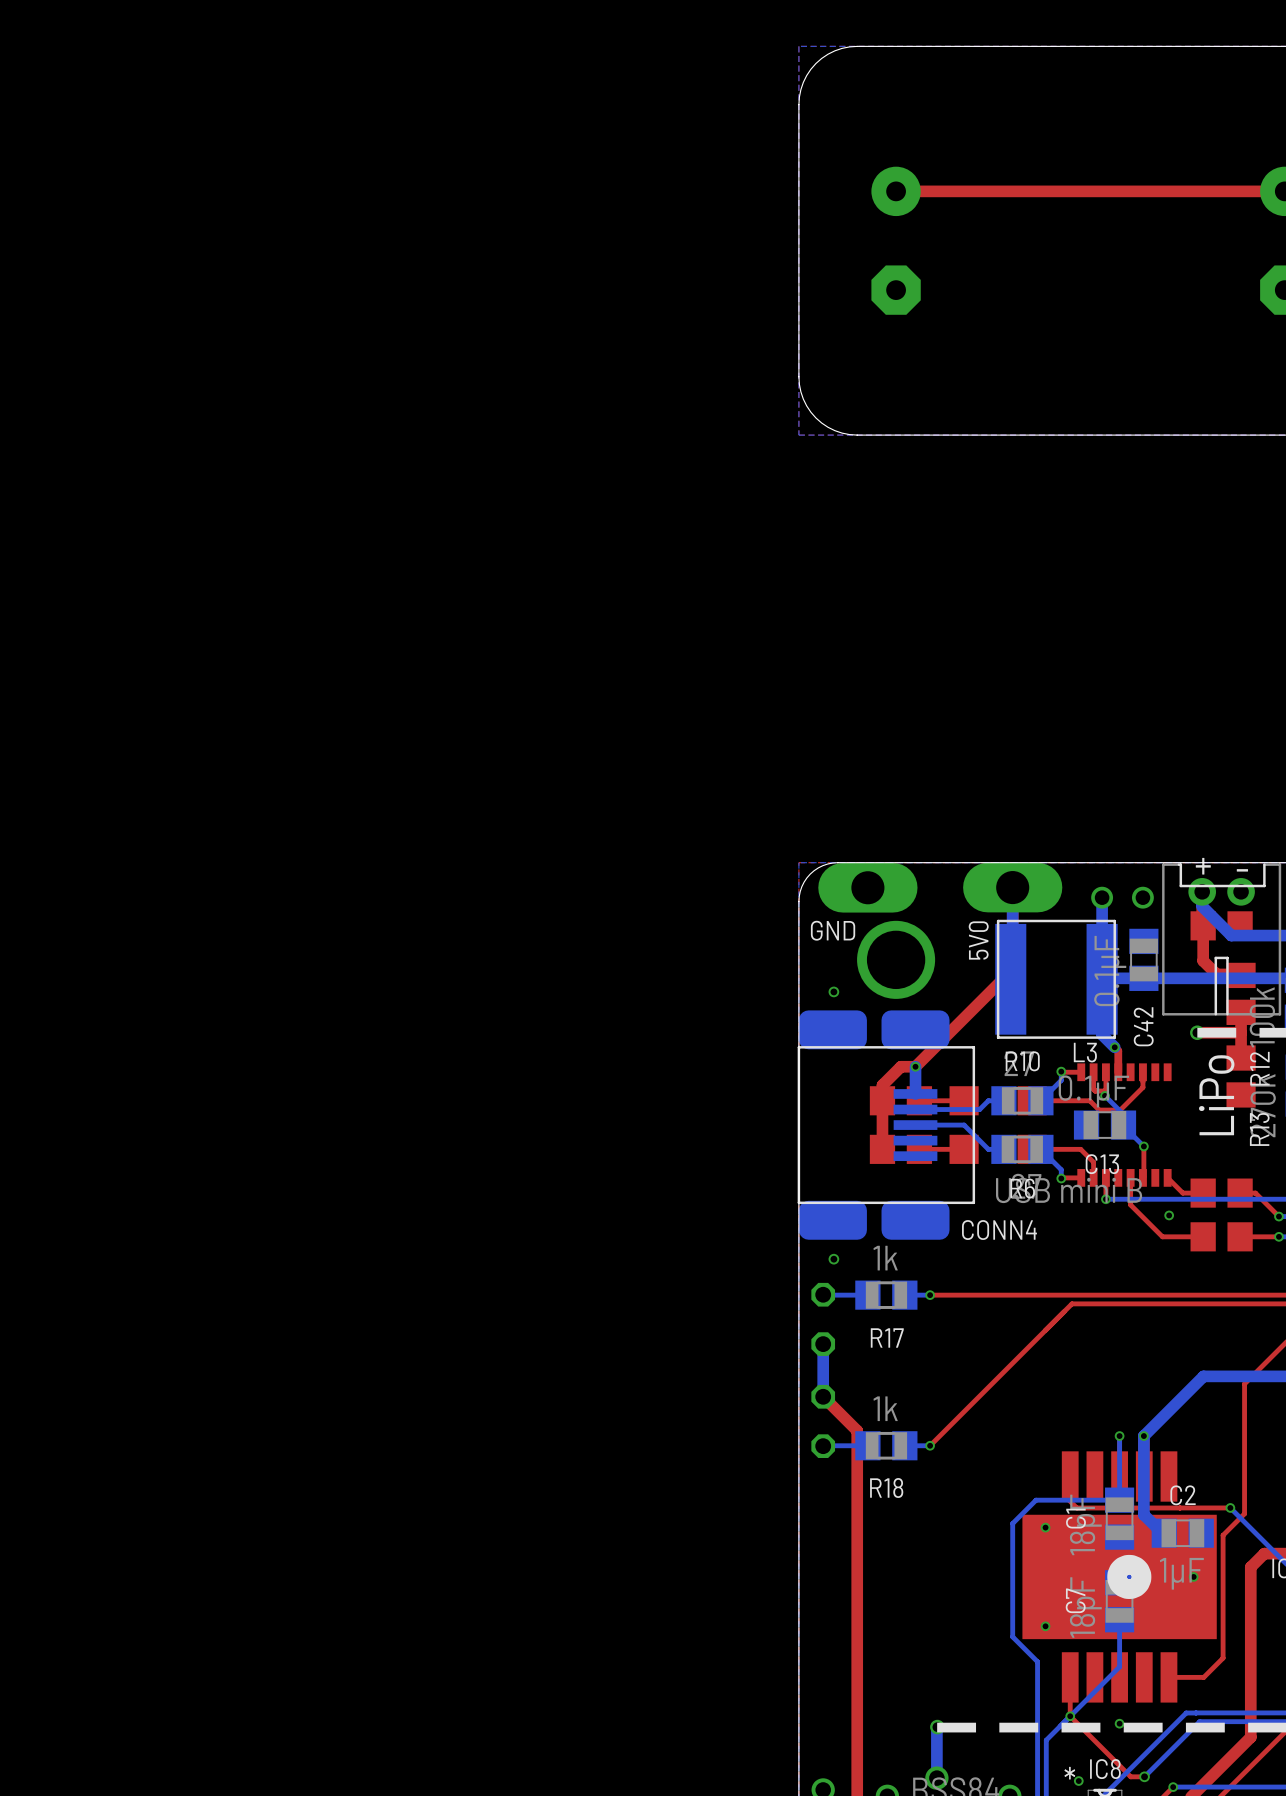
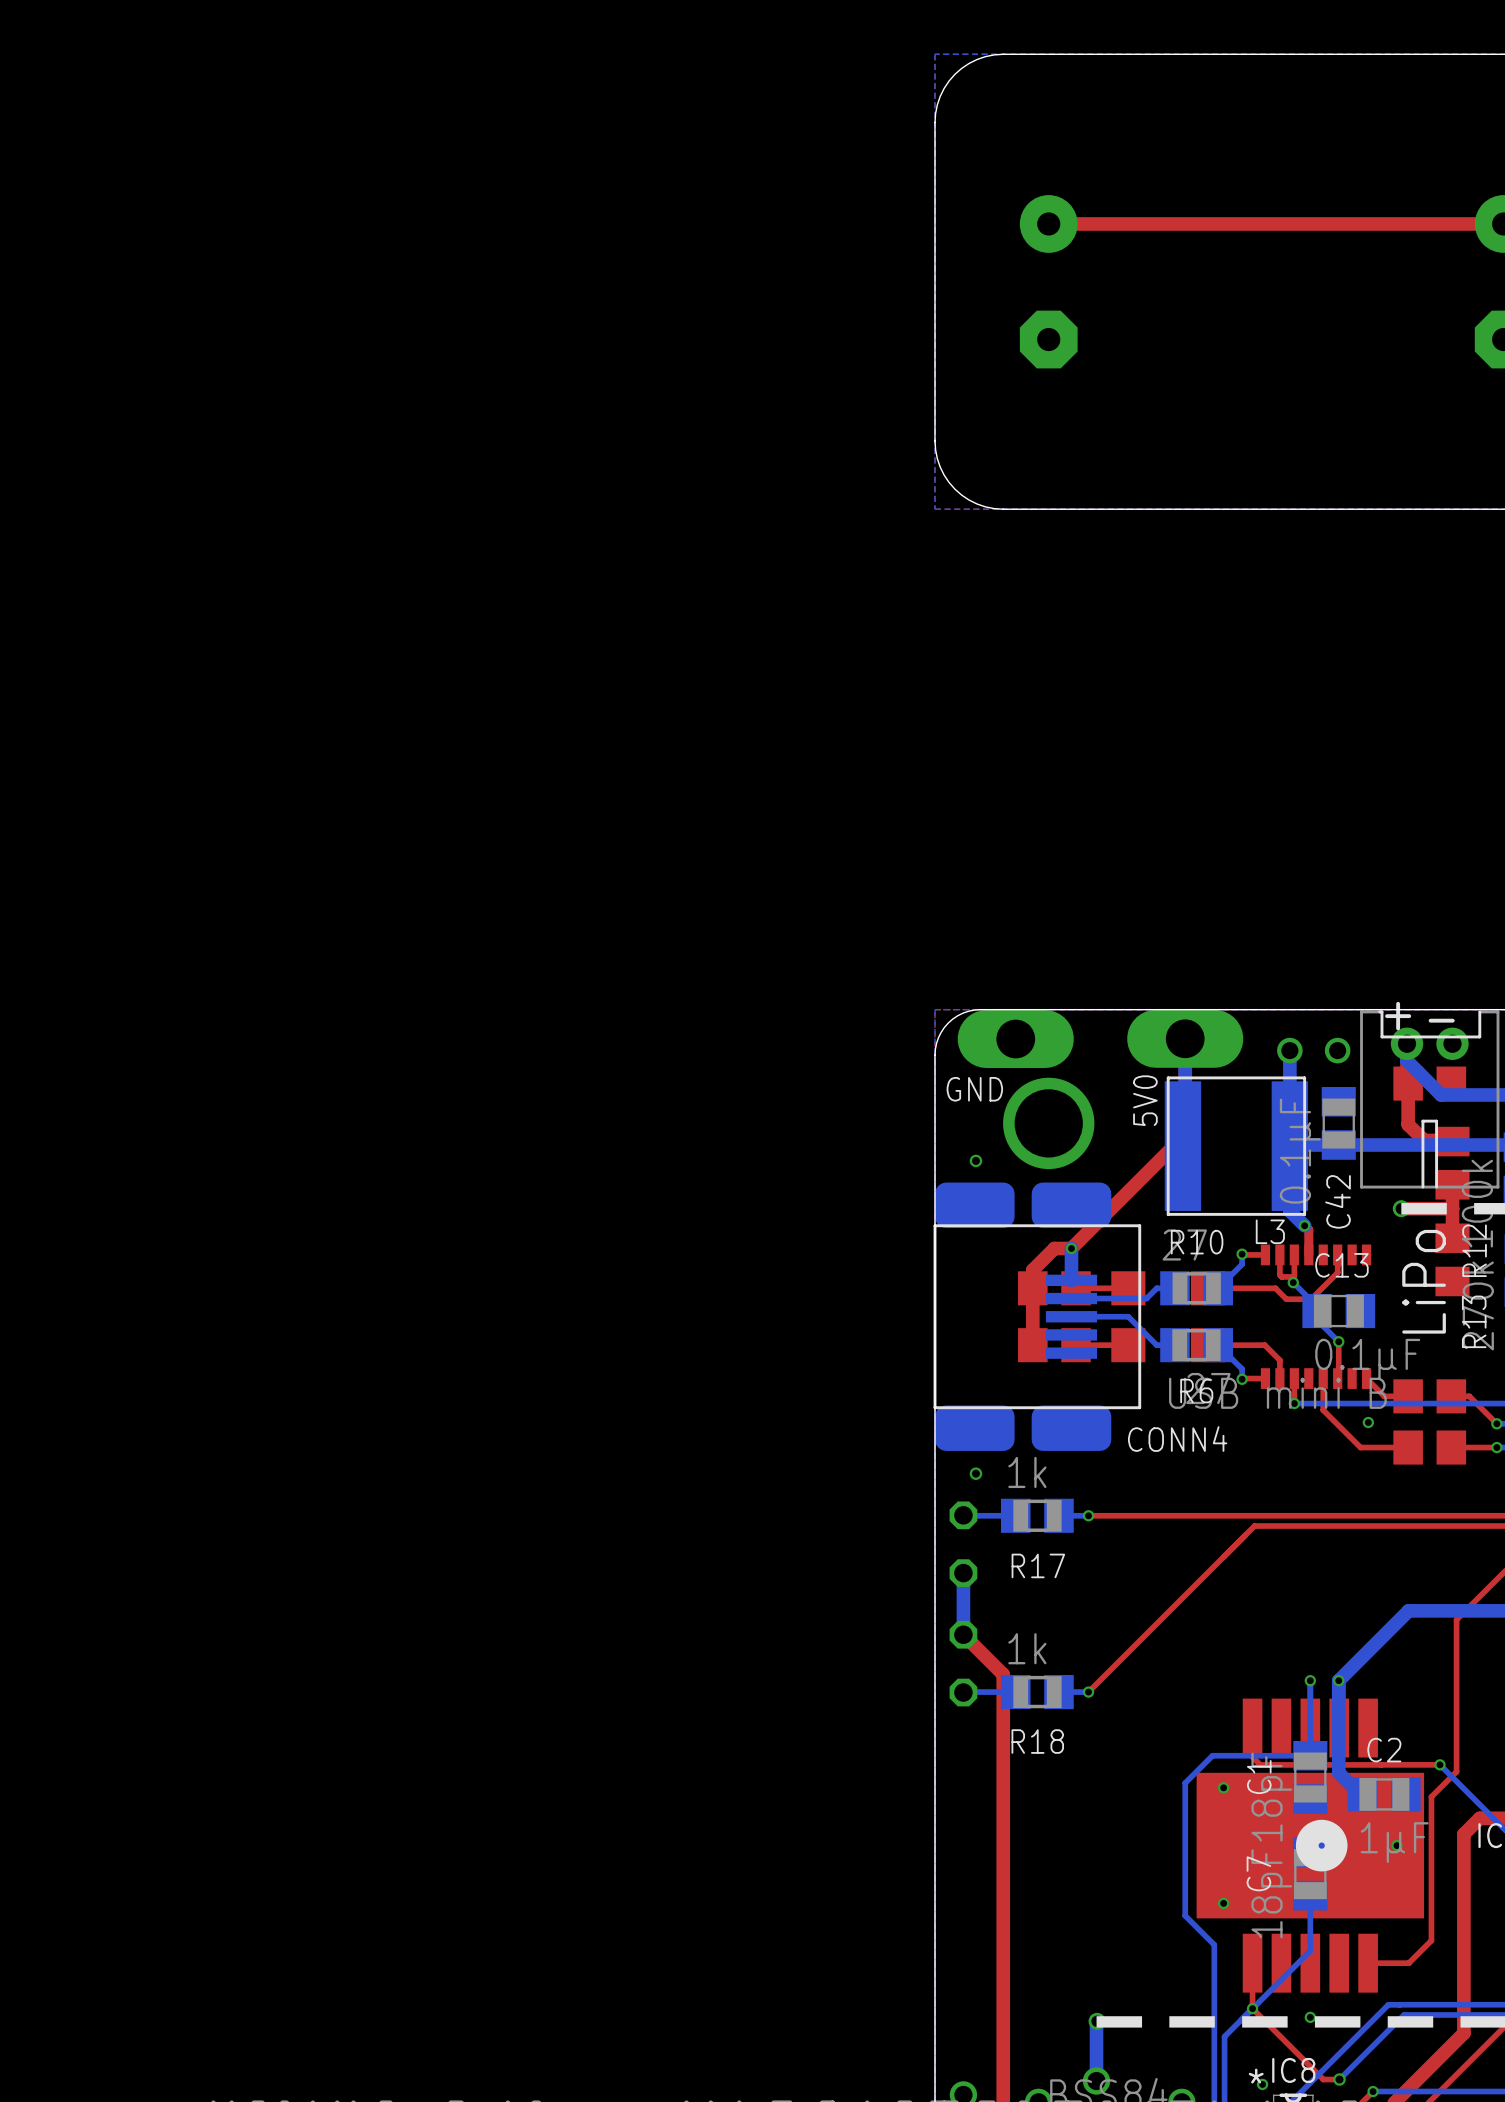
C13 value position: 0.1µF (1093, 1091) -> 0.1µF (1367, 1359)
C13 position: (1105, 1125) -> (1338, 1311)
C13 name position: C13 (1102, 1164) -> C13 (1341, 1265)

